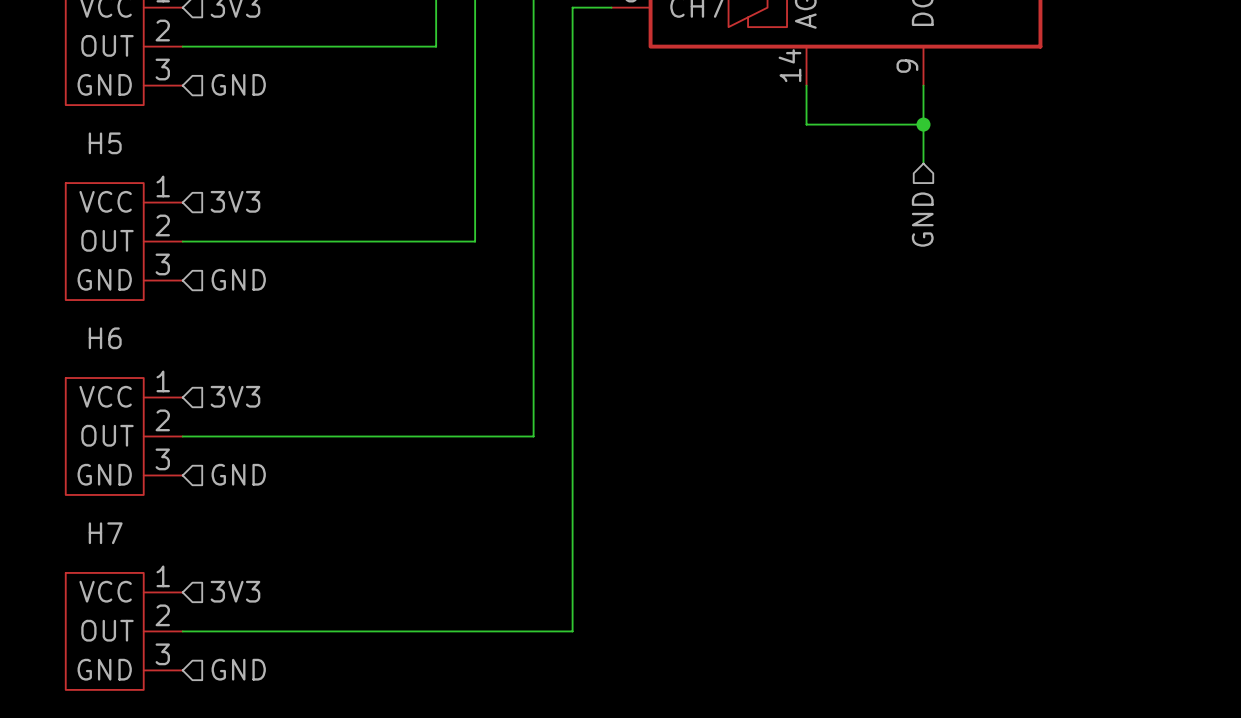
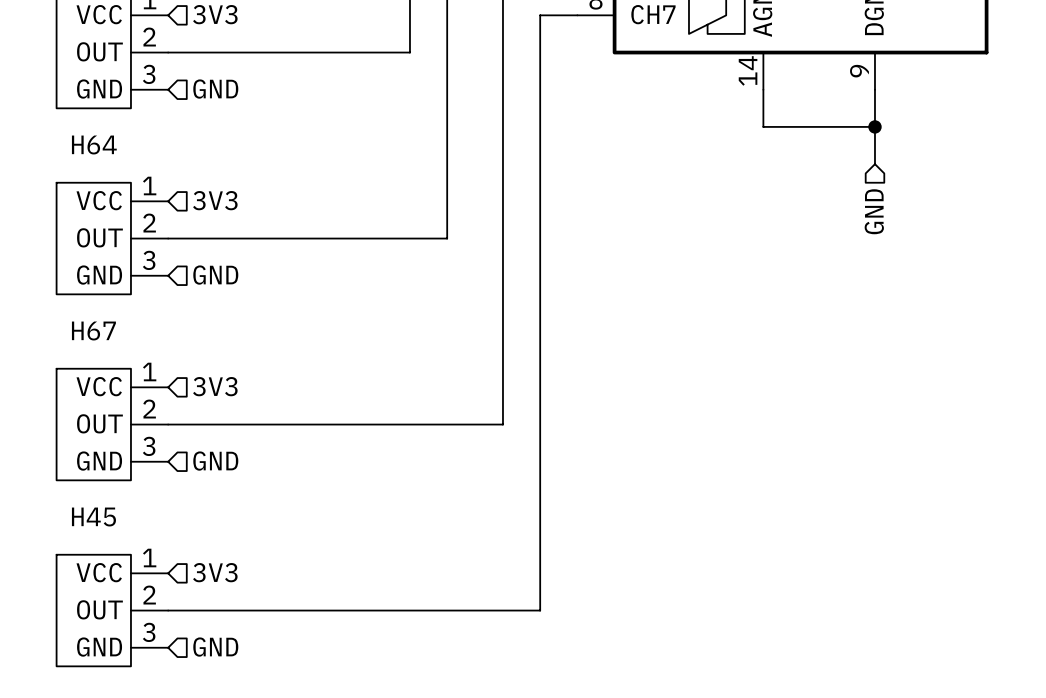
H5 name: H5 (105, 143) -> H64 (94, 145)
H6 name: H6 (105, 338) -> H67 (93, 331)
H7 name: H7 (105, 533) -> H45 (93, 517)

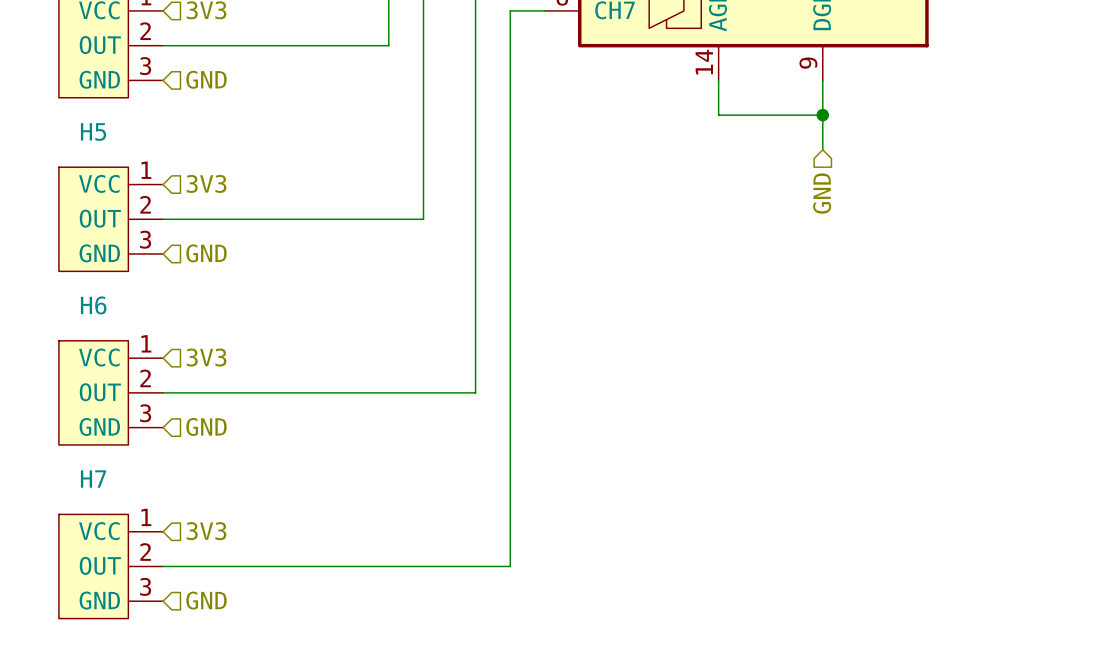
H64 name: H64 (94, 145) -> H5 (93, 132)
H67 name: H67 (93, 331) -> H6 (93, 305)
H45 name: H45 (93, 517) -> H7 (93, 479)

